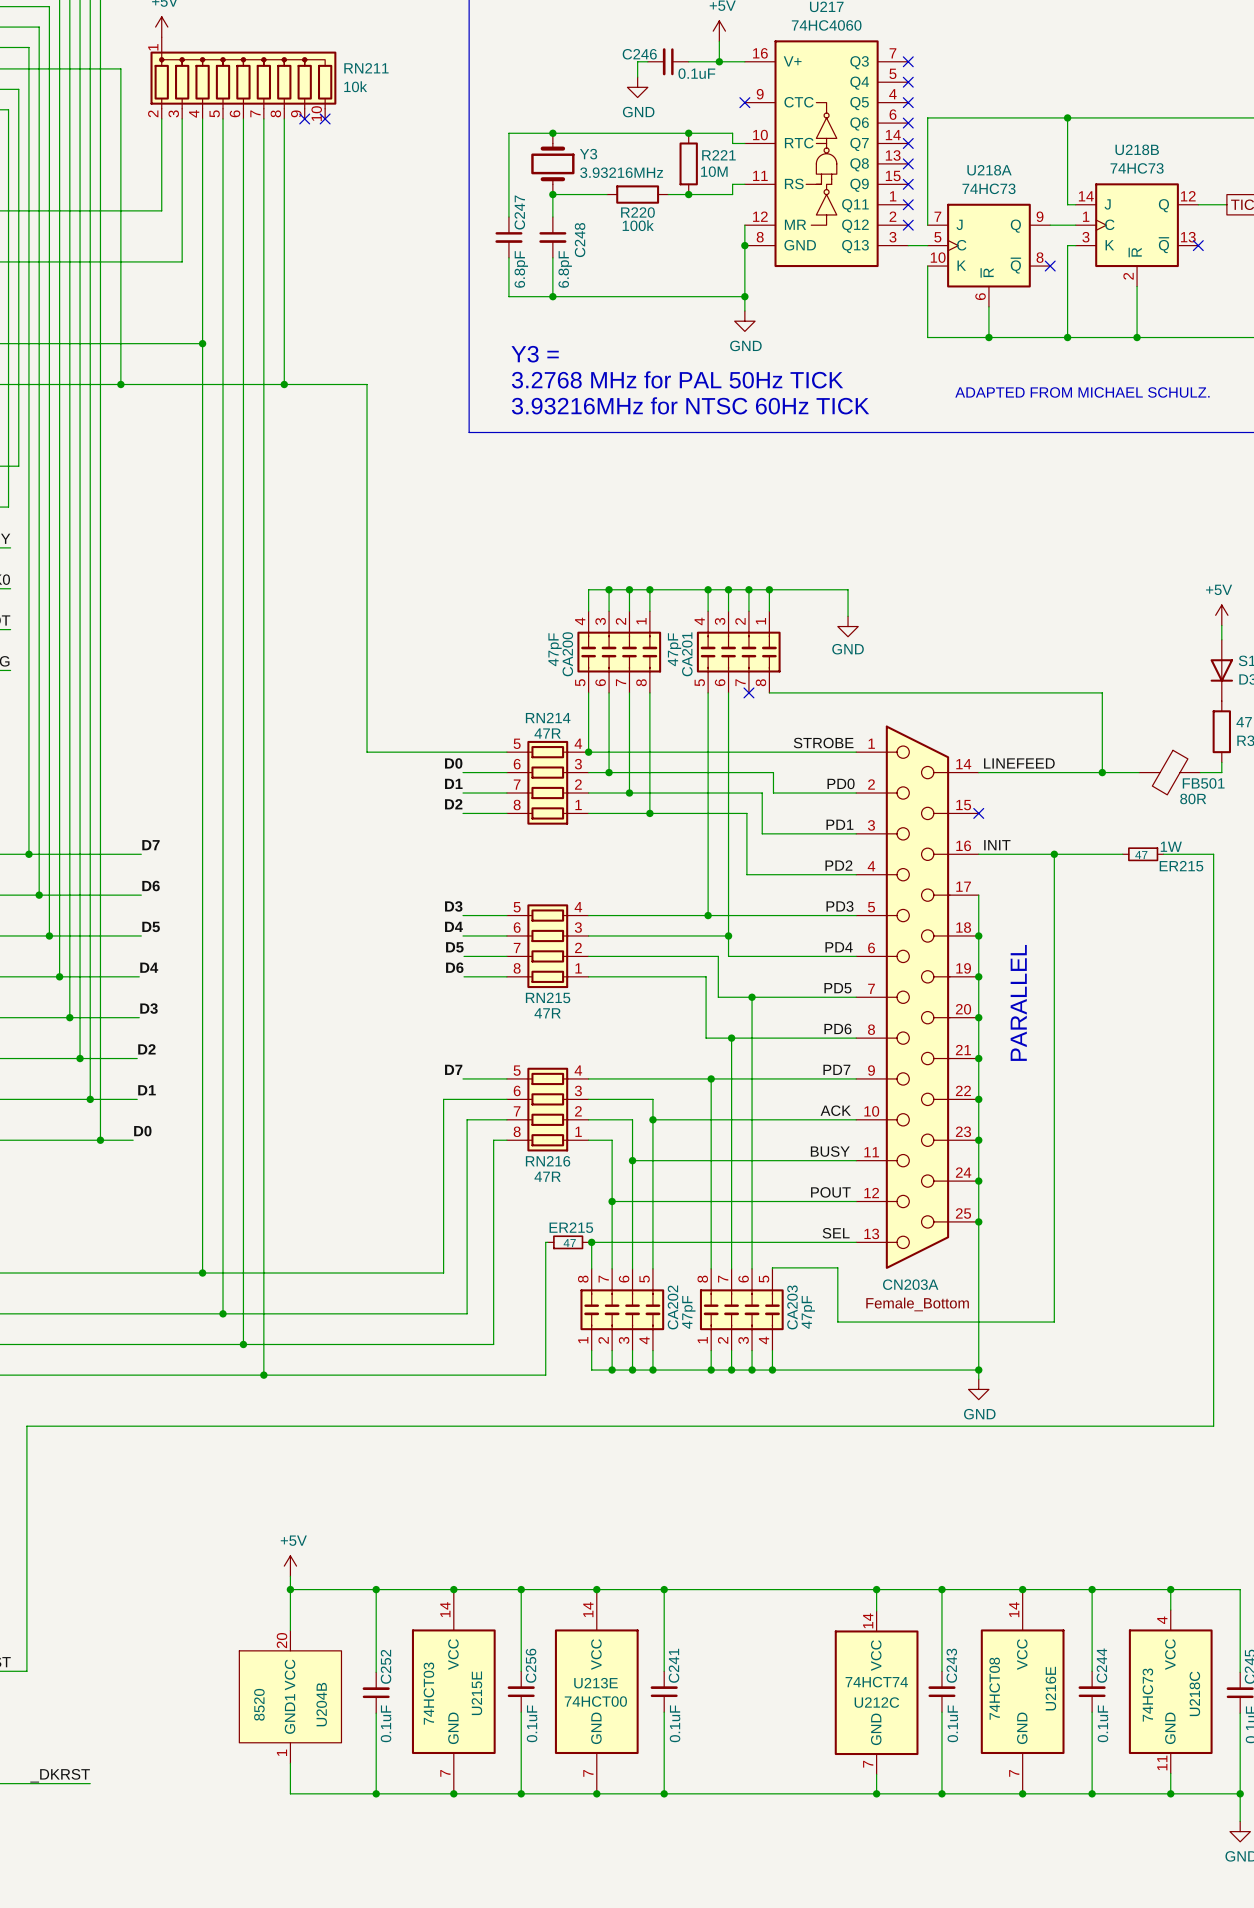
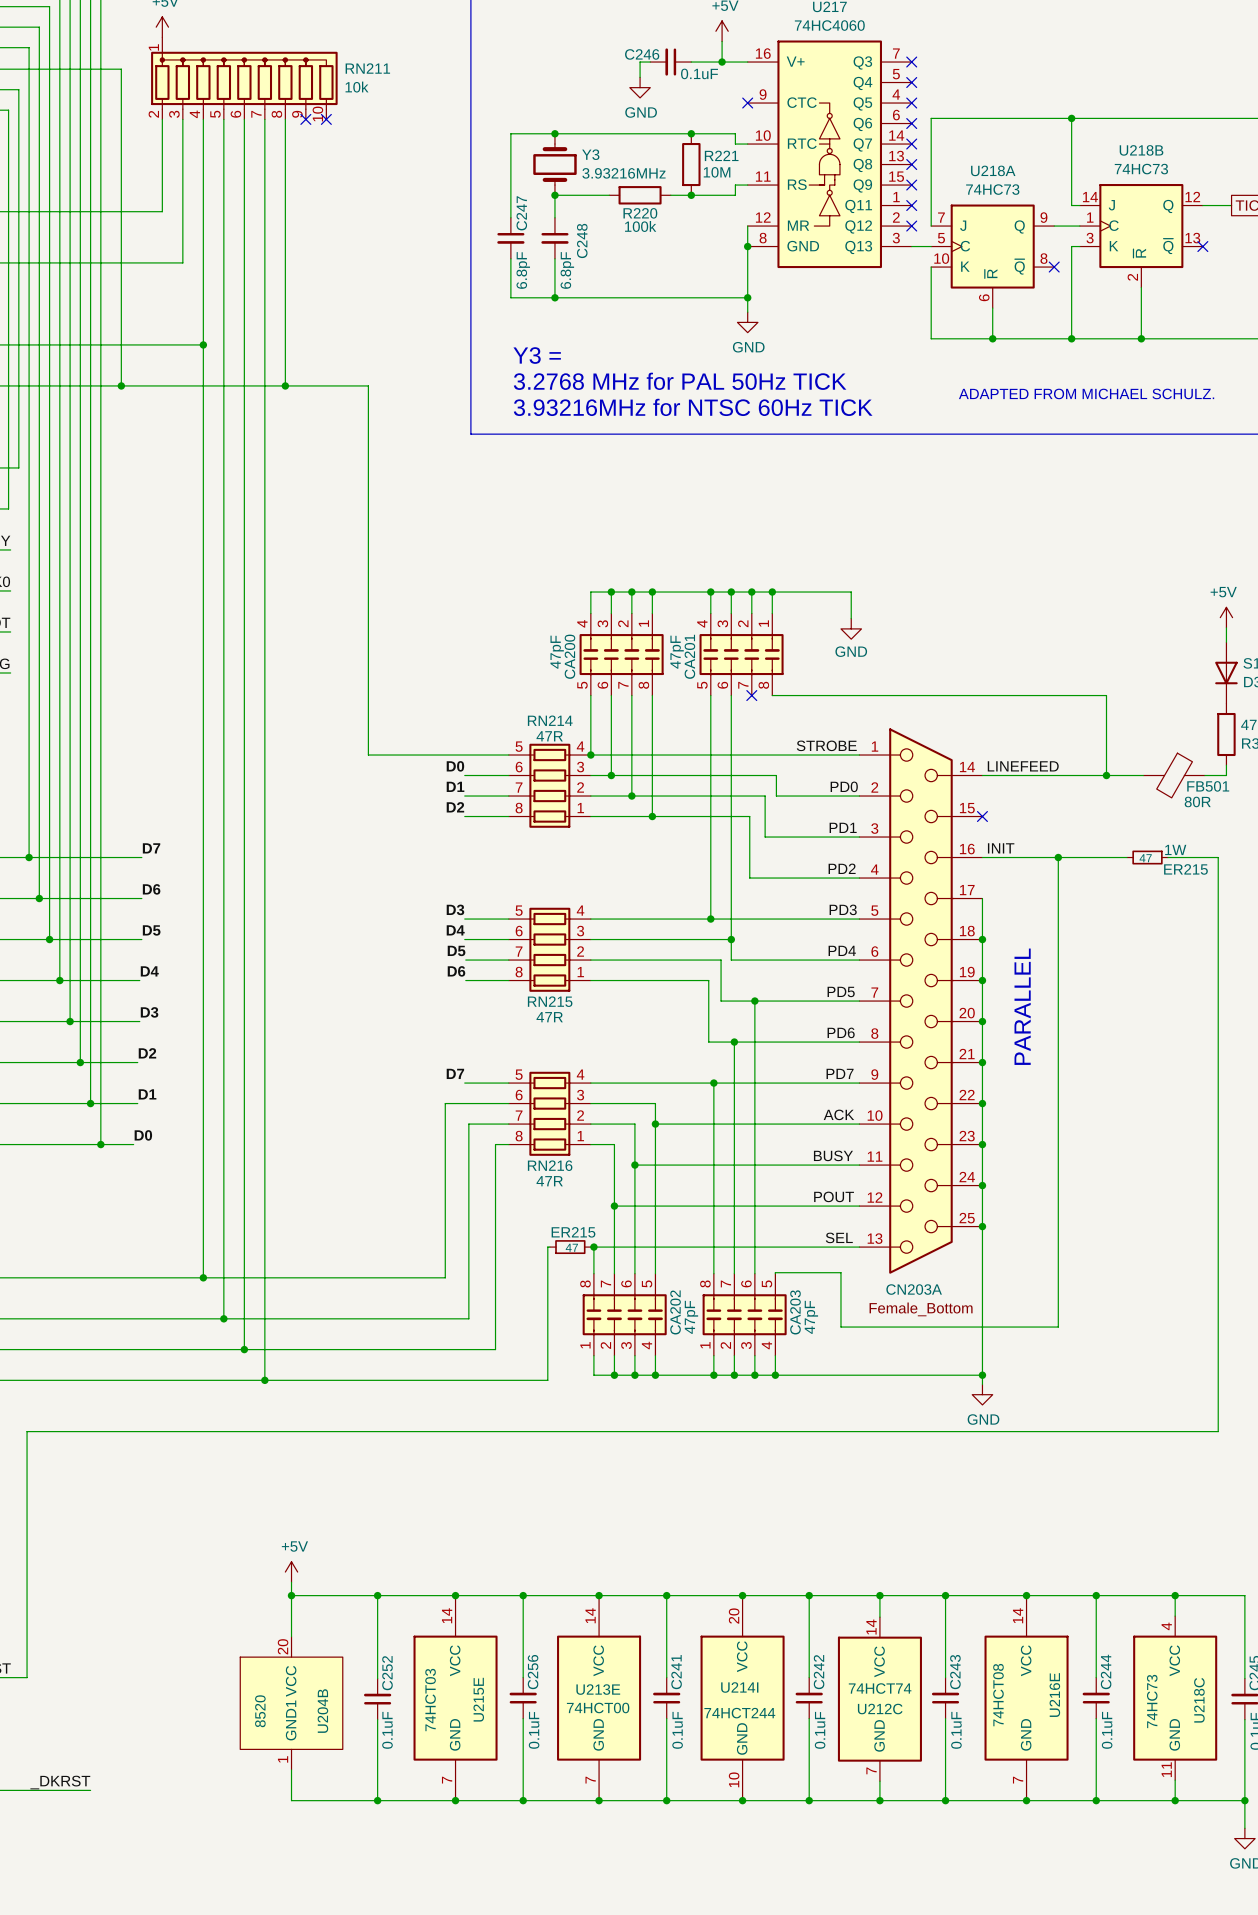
junction: none -> (742, 1595)
wire: none -> (809, 1595) (809, 1677)
junction: none -> (809, 1595)
U214I: none -> 74HCT244 (742, 1698)
C242: none -> 0.1uF (809, 1698)
wire: none -> (809, 1718) (809, 1800)
junction: none -> (742, 1800)
junction: none -> (809, 1800)

